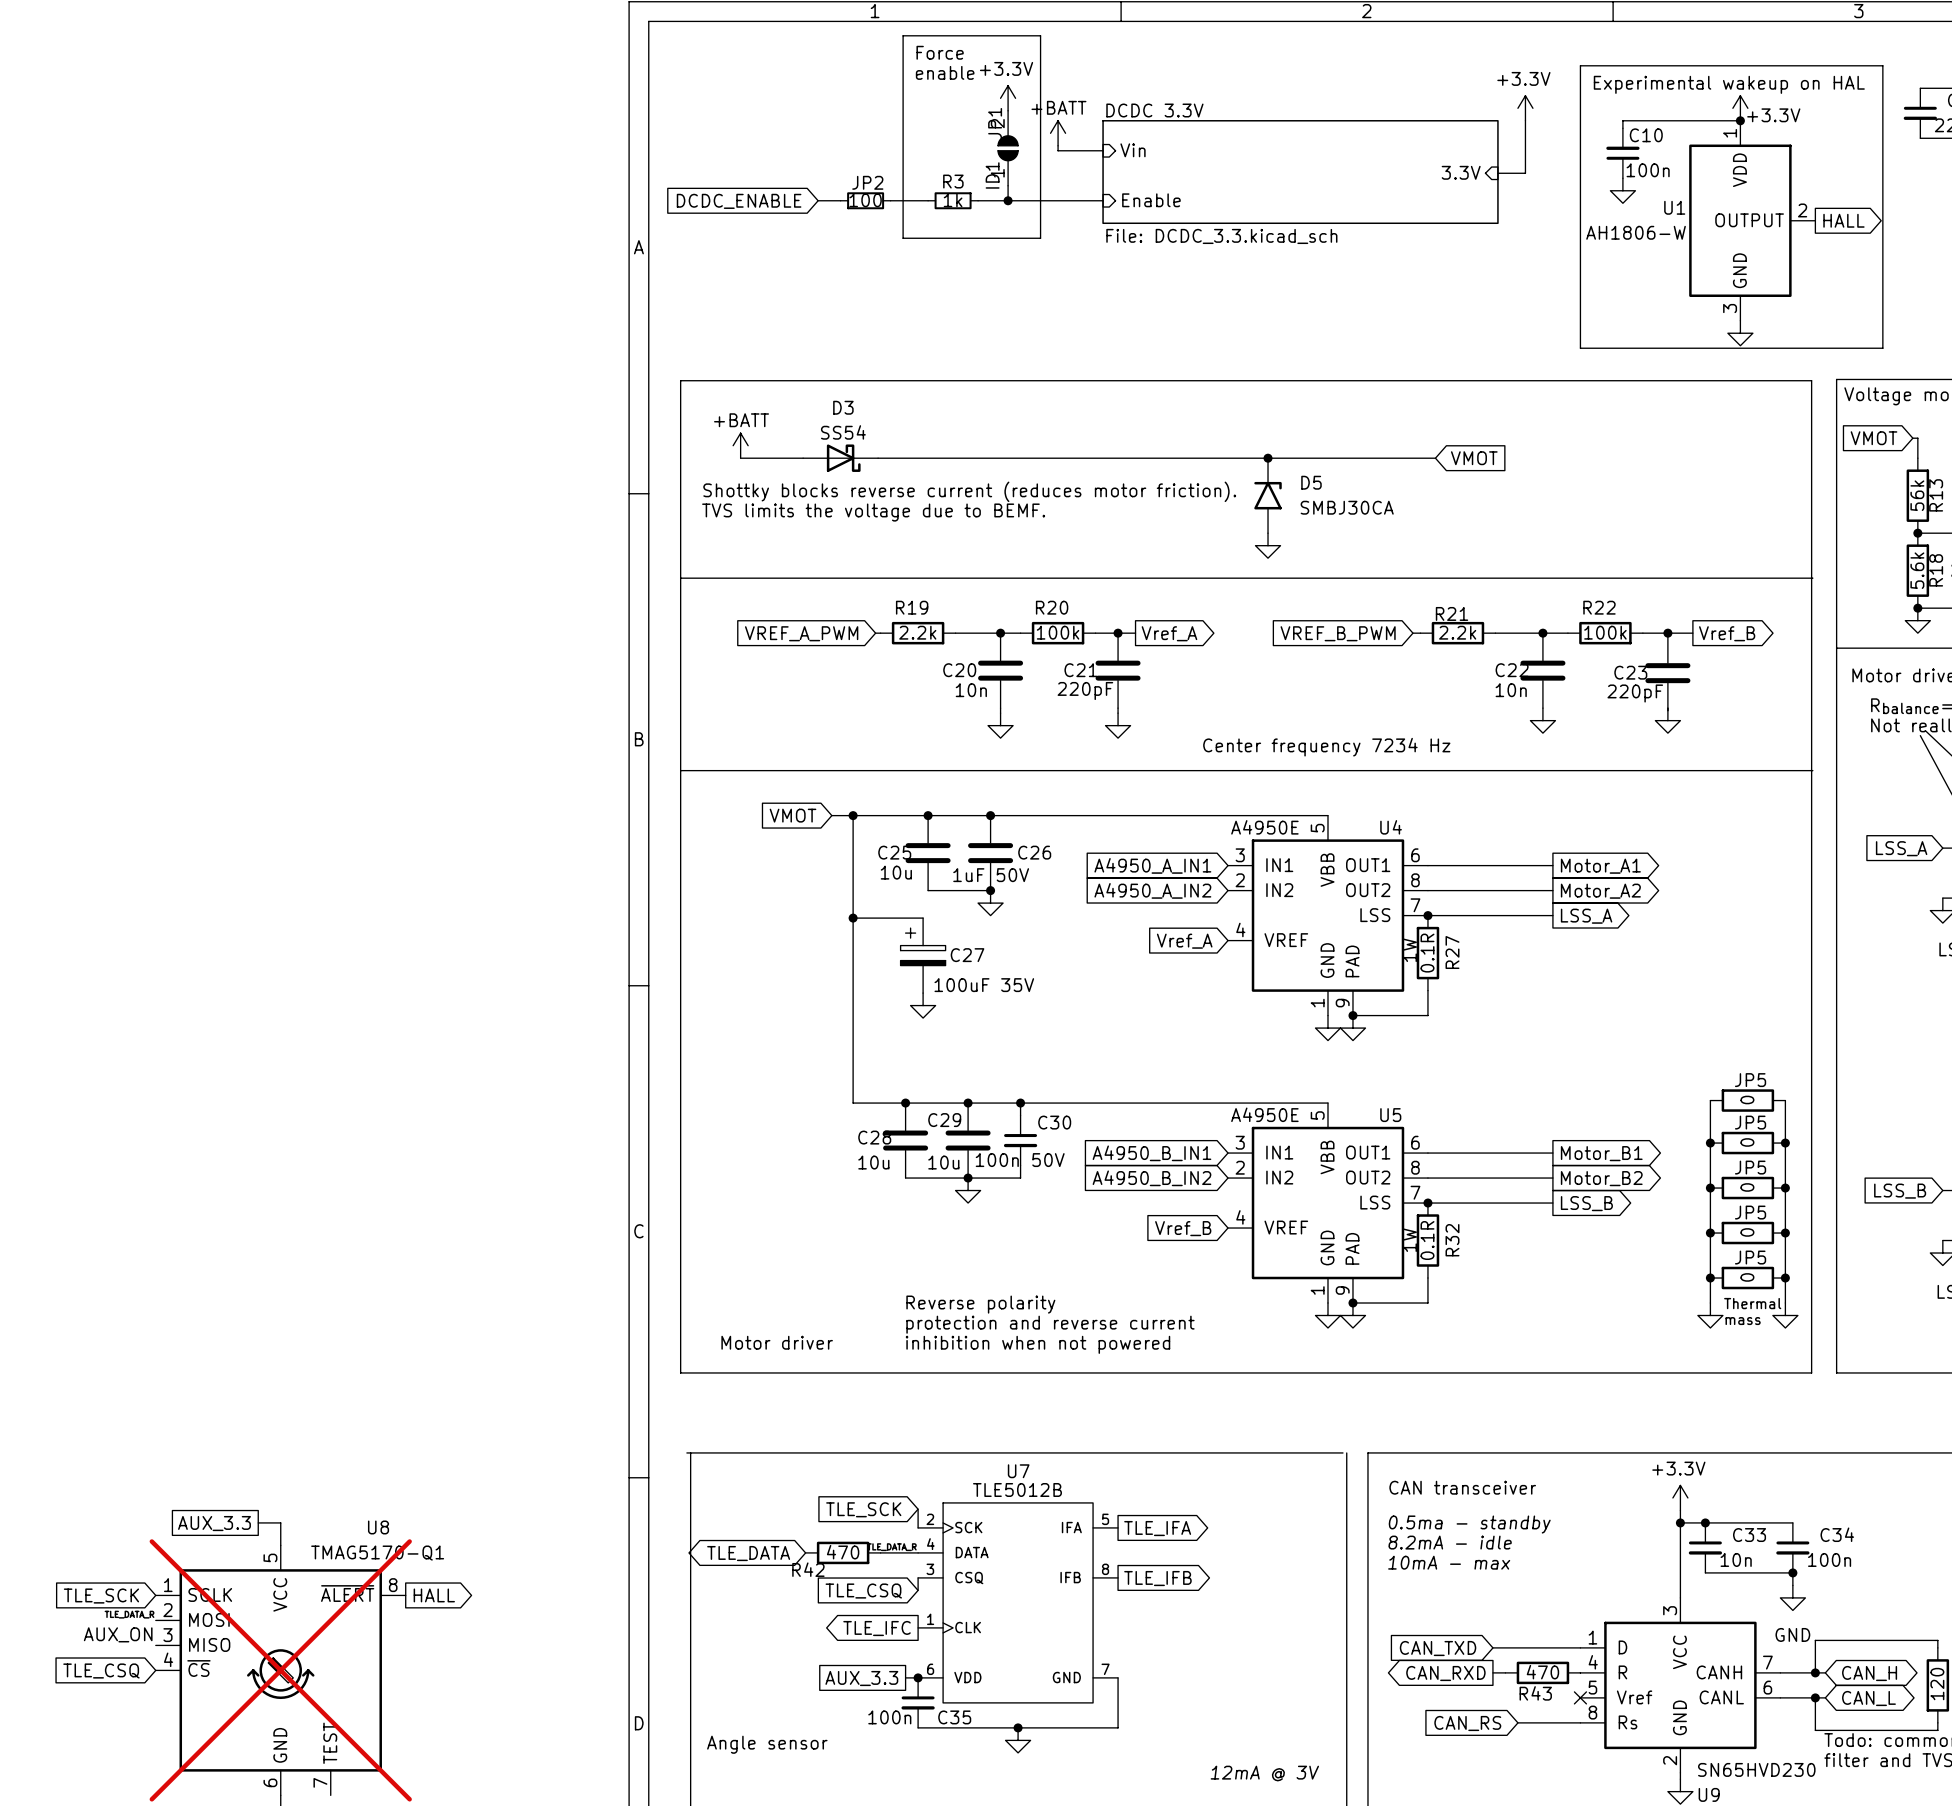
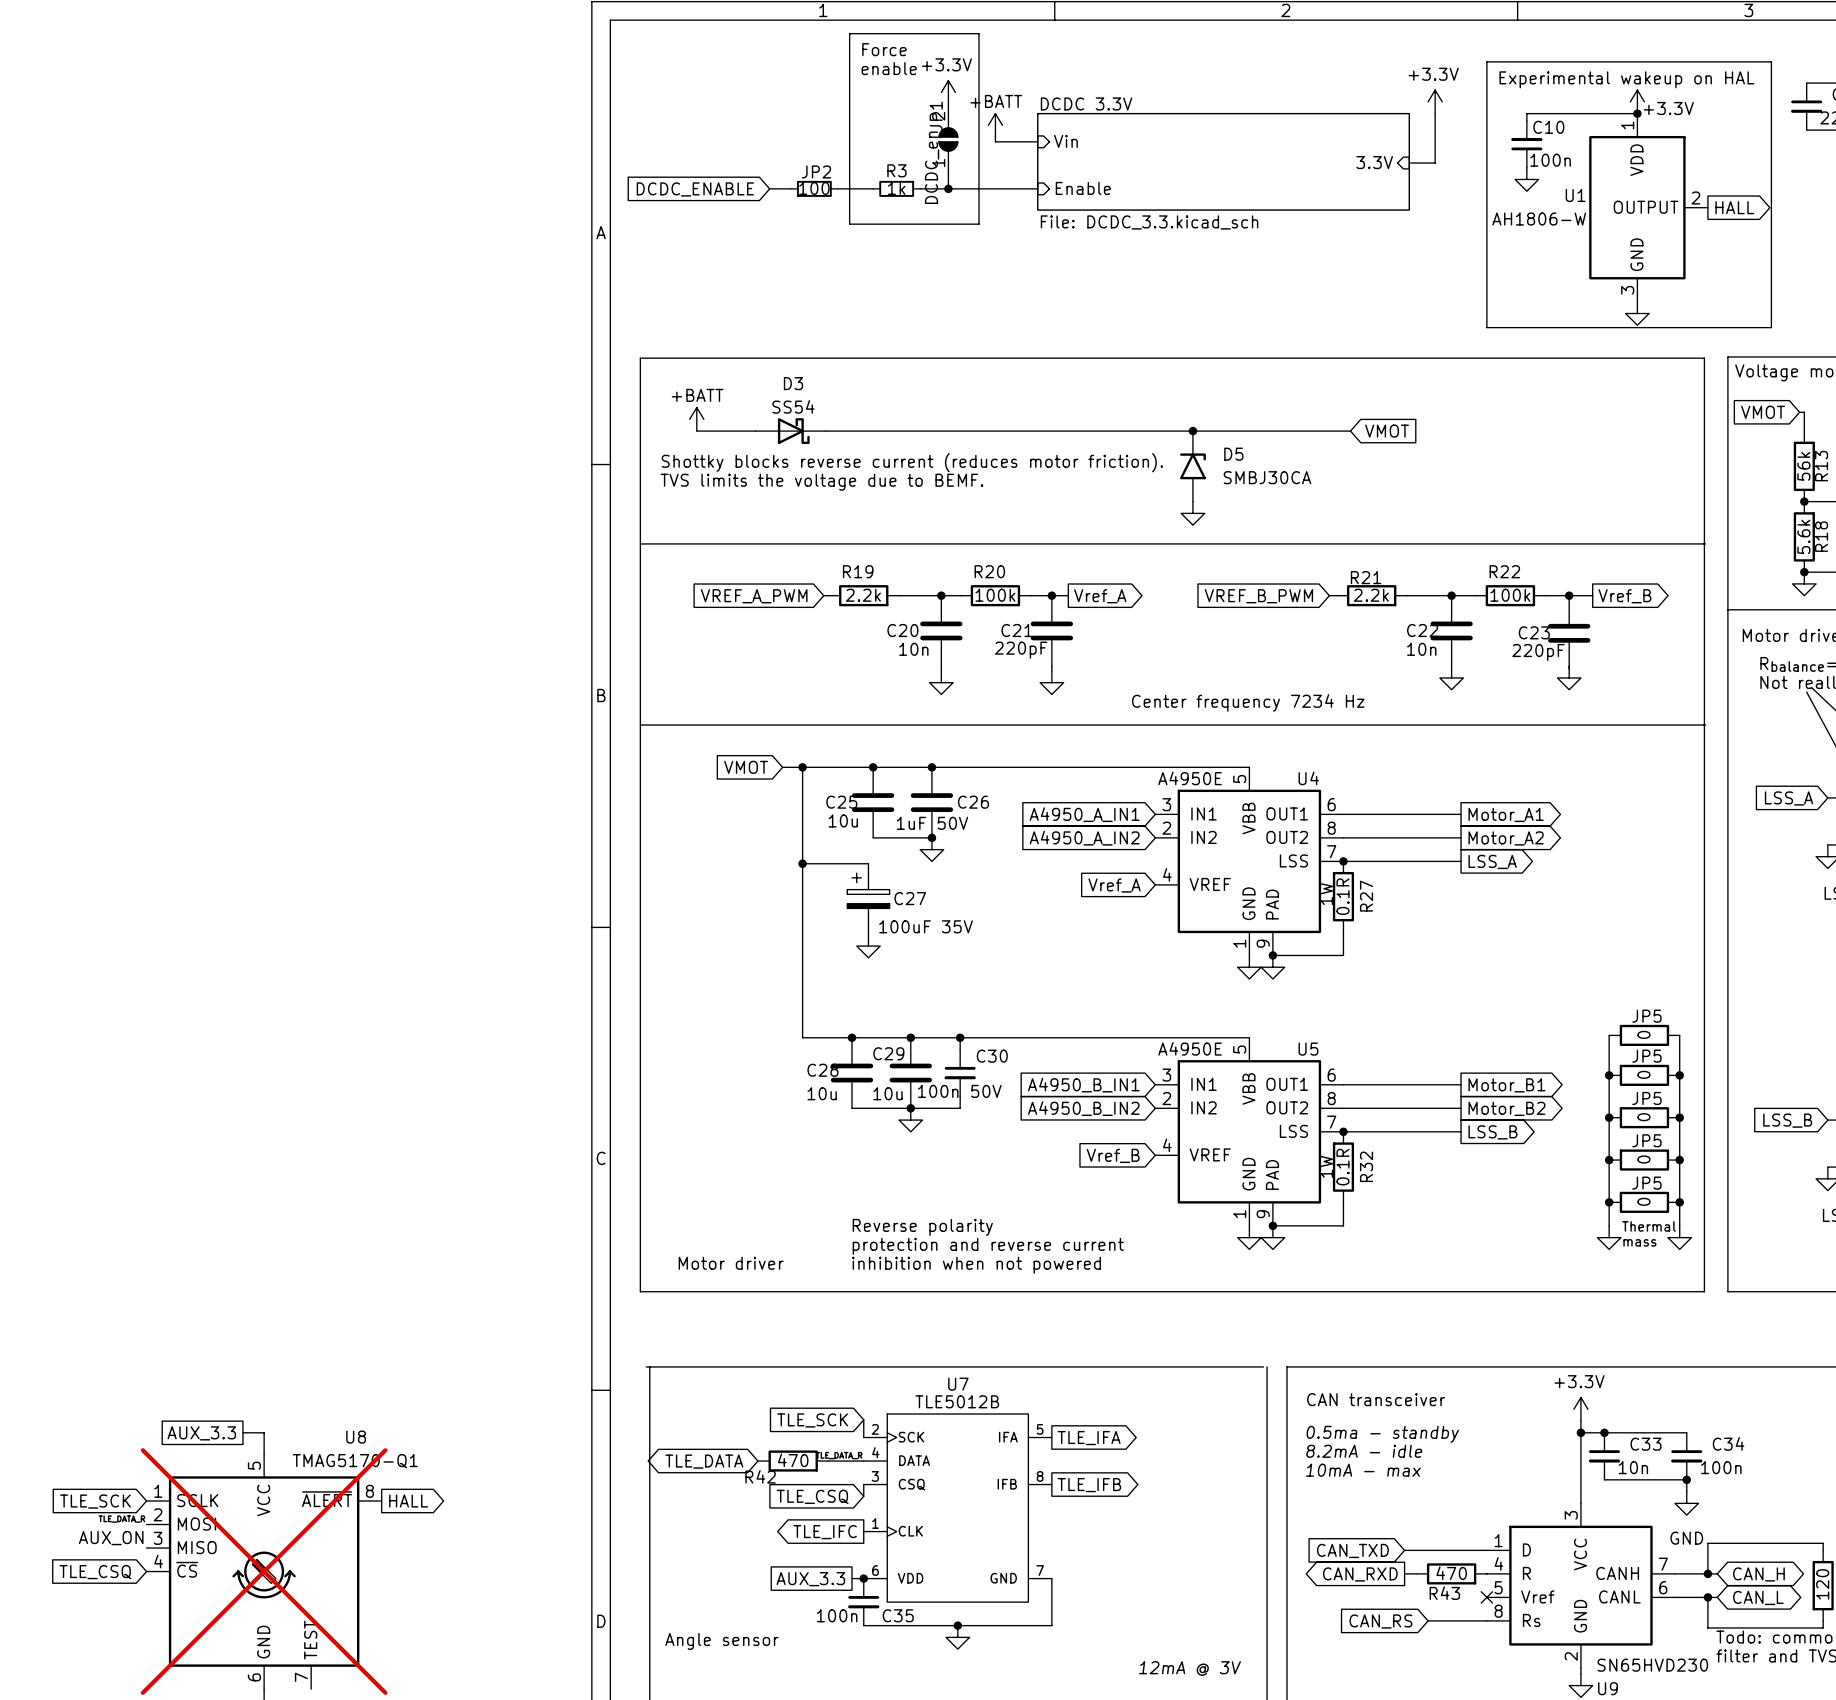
JP1 value: ID1 (992, 175) -> DCDC_en (932, 167)

